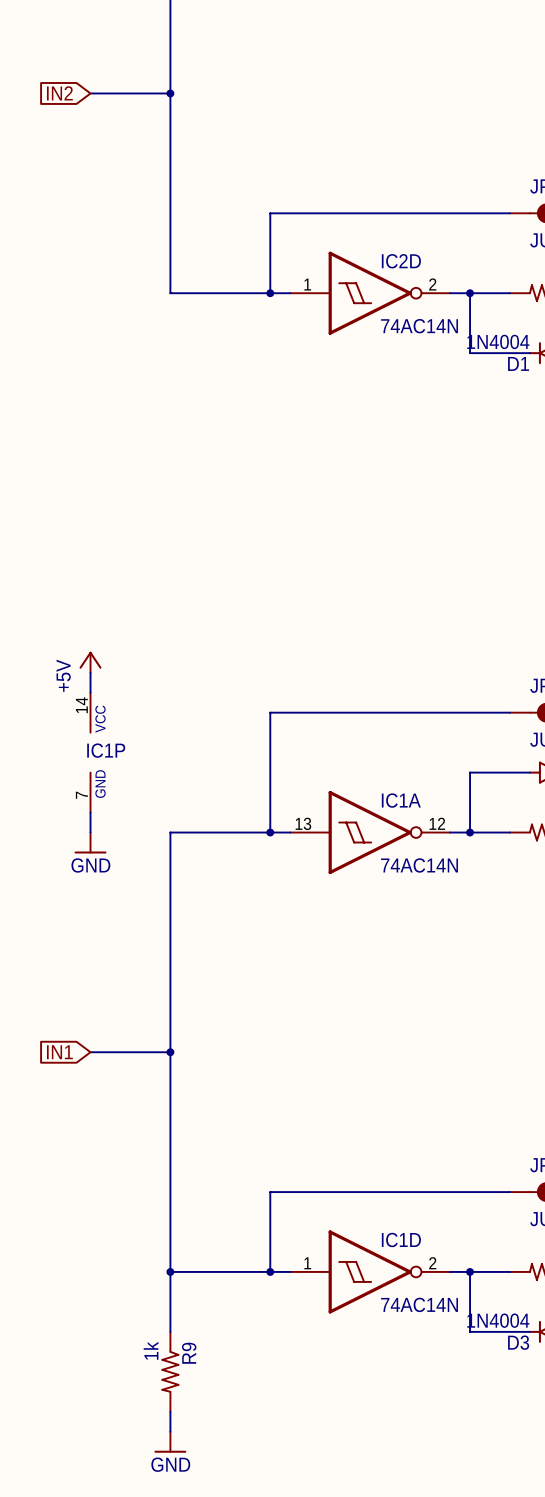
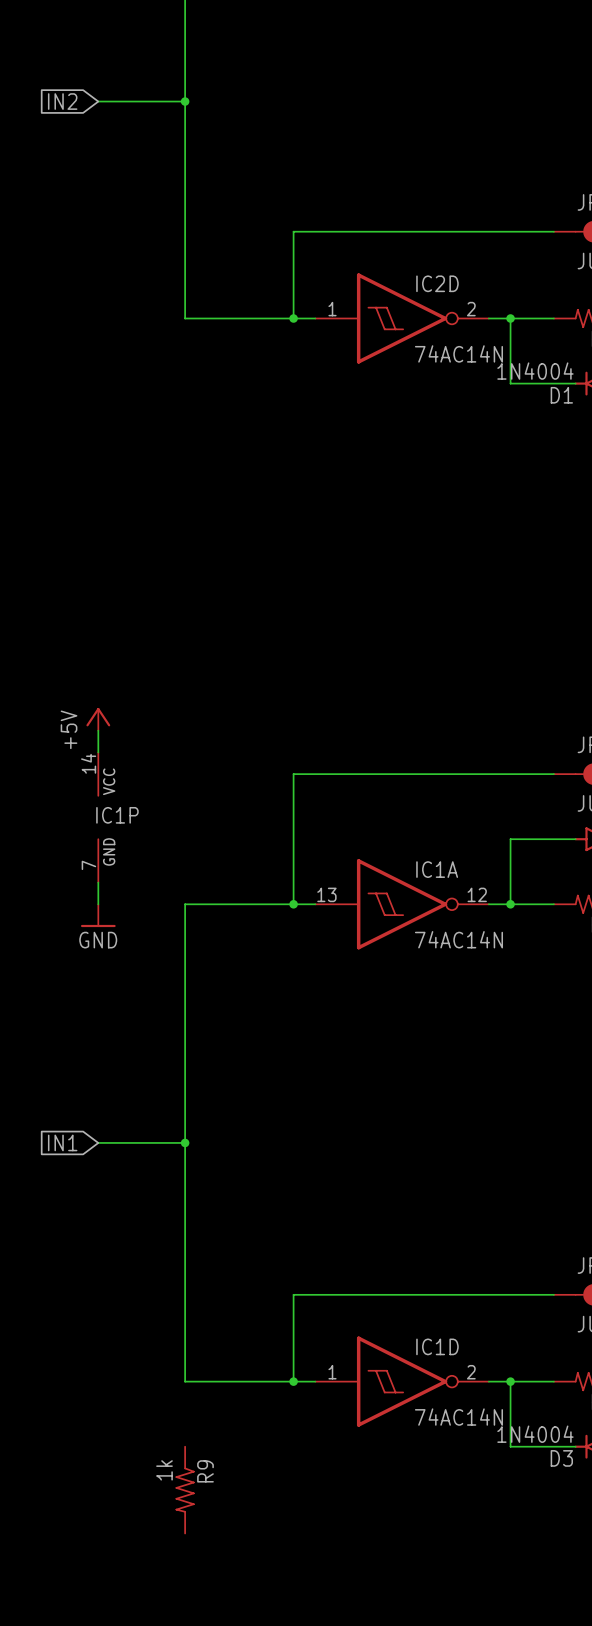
wire: (170, 1271) (170, 1331) -> none
junction: (170, 1271) -> none
wire: (170, 1411) (170, 1431) -> none
power symbol: GND (170, 1442) -> none

